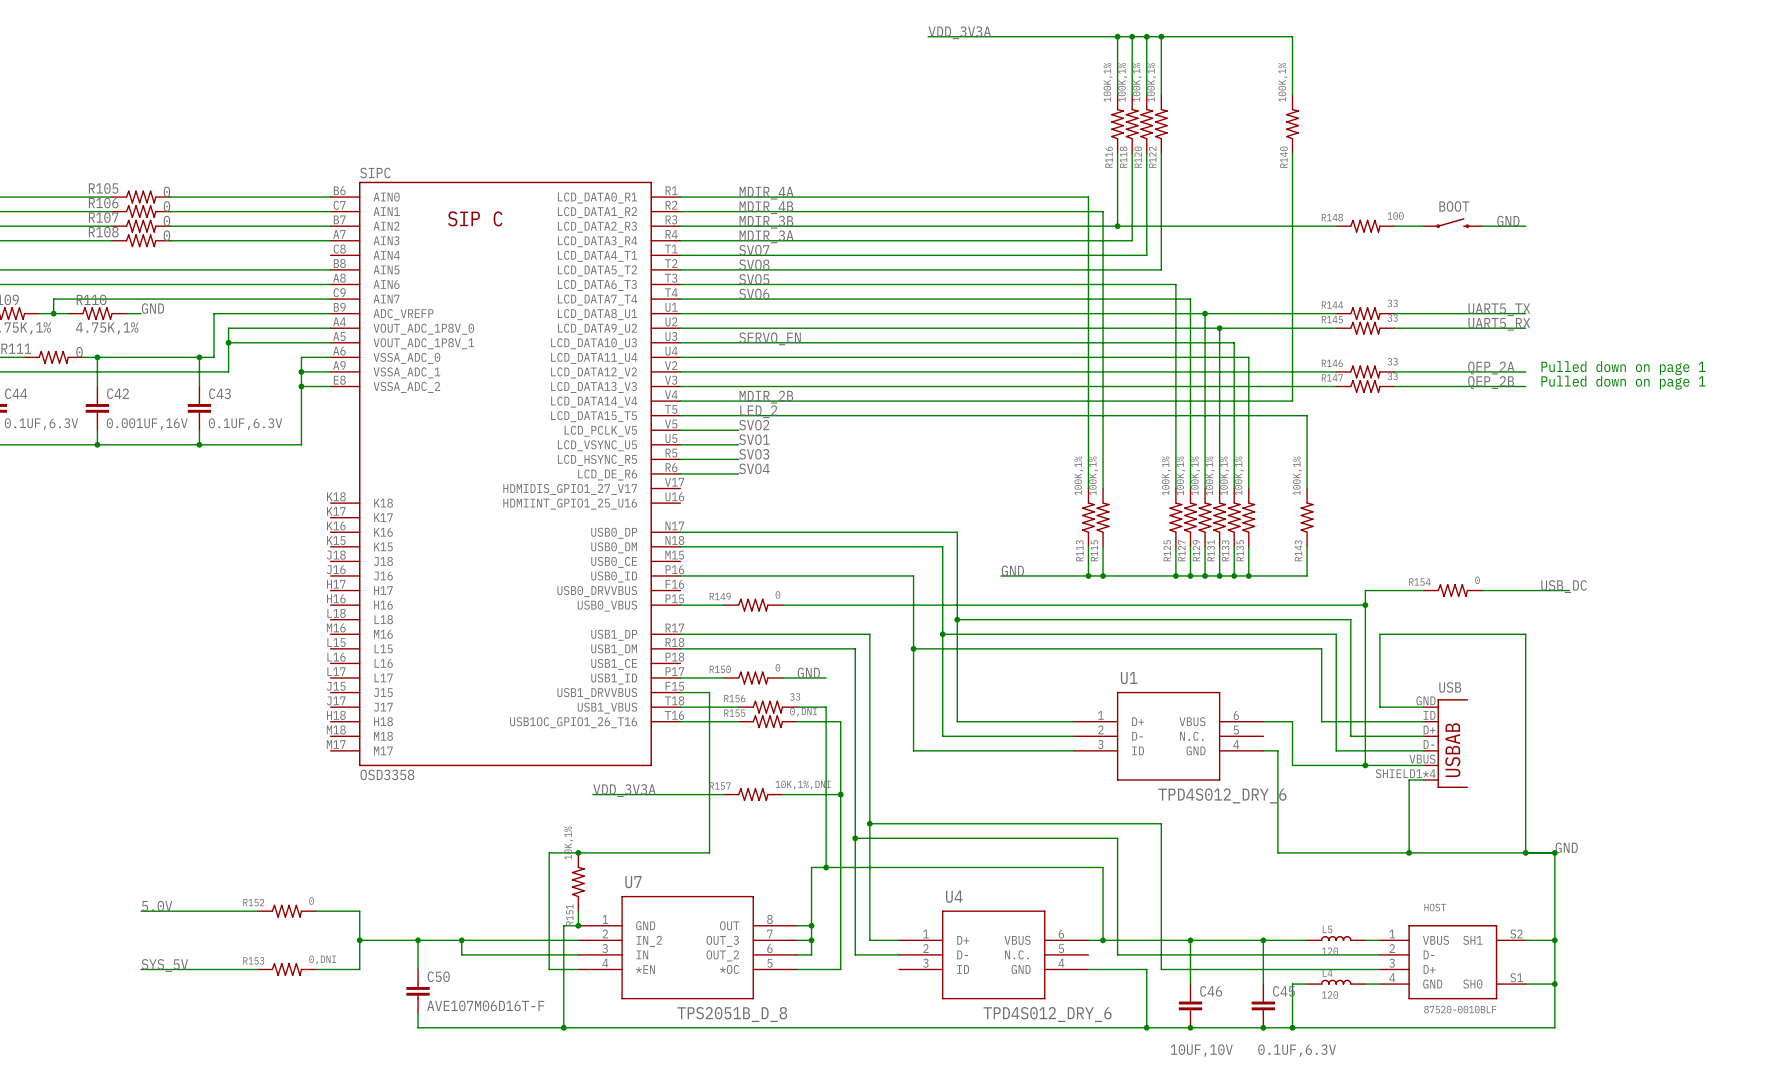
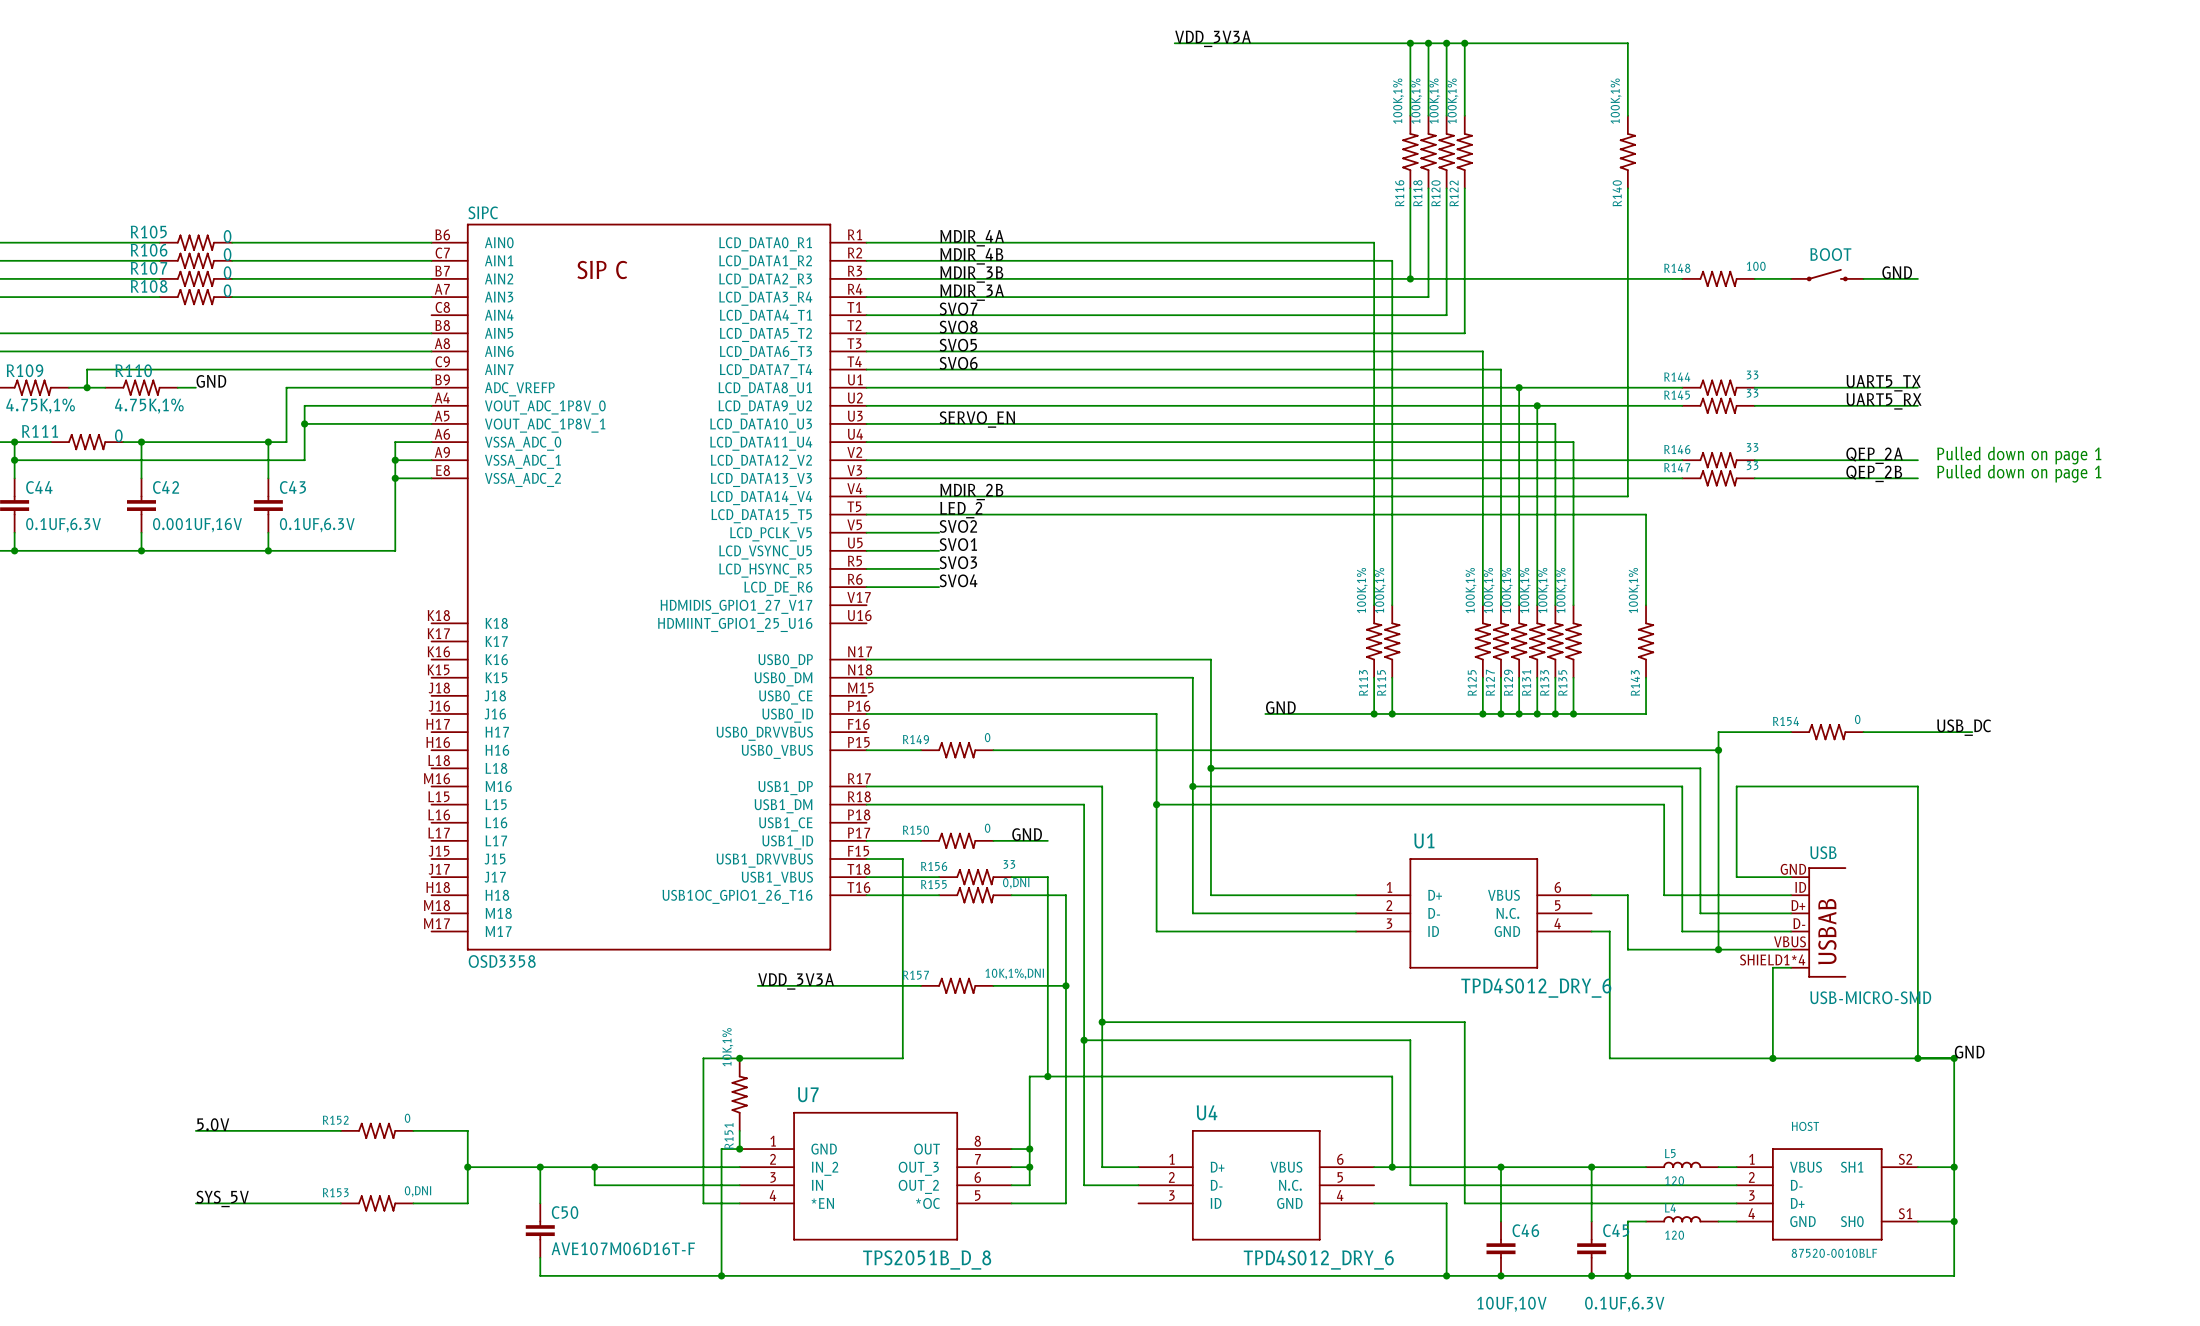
USB value: none -> USB-MICRO-SMD (1870, 997)

